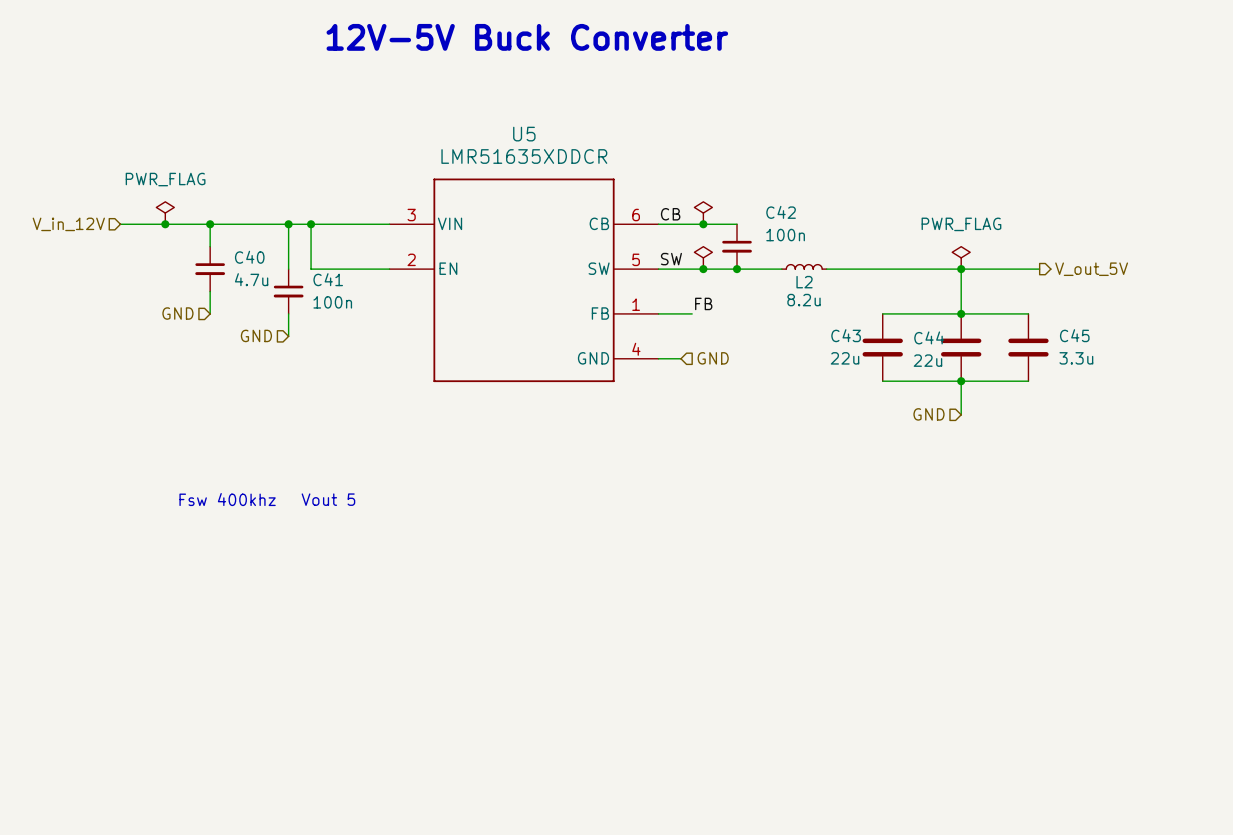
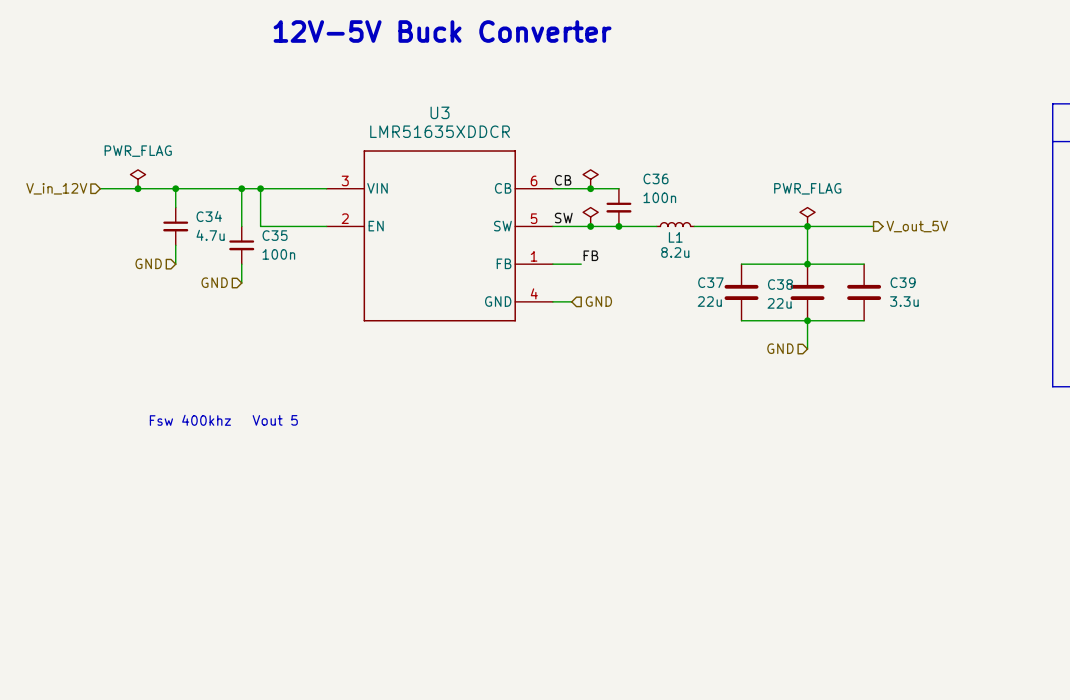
U5 name: U5 (524, 134) -> U3 (440, 112)
C42 name: C42 (781, 212) -> C36 (656, 178)
C40 name: C40 (249, 257) -> C34 (209, 216)
C41 name: C41 (328, 279) -> C35 (275, 235)
L2 name: L2 (804, 282) -> L1 (675, 237)
C43 name: C43 (846, 335) -> C37 (710, 282)
C45 name: C45 (1074, 335) -> C39 (903, 282)
C44 name: C44 (929, 337) -> C38 (780, 284)

